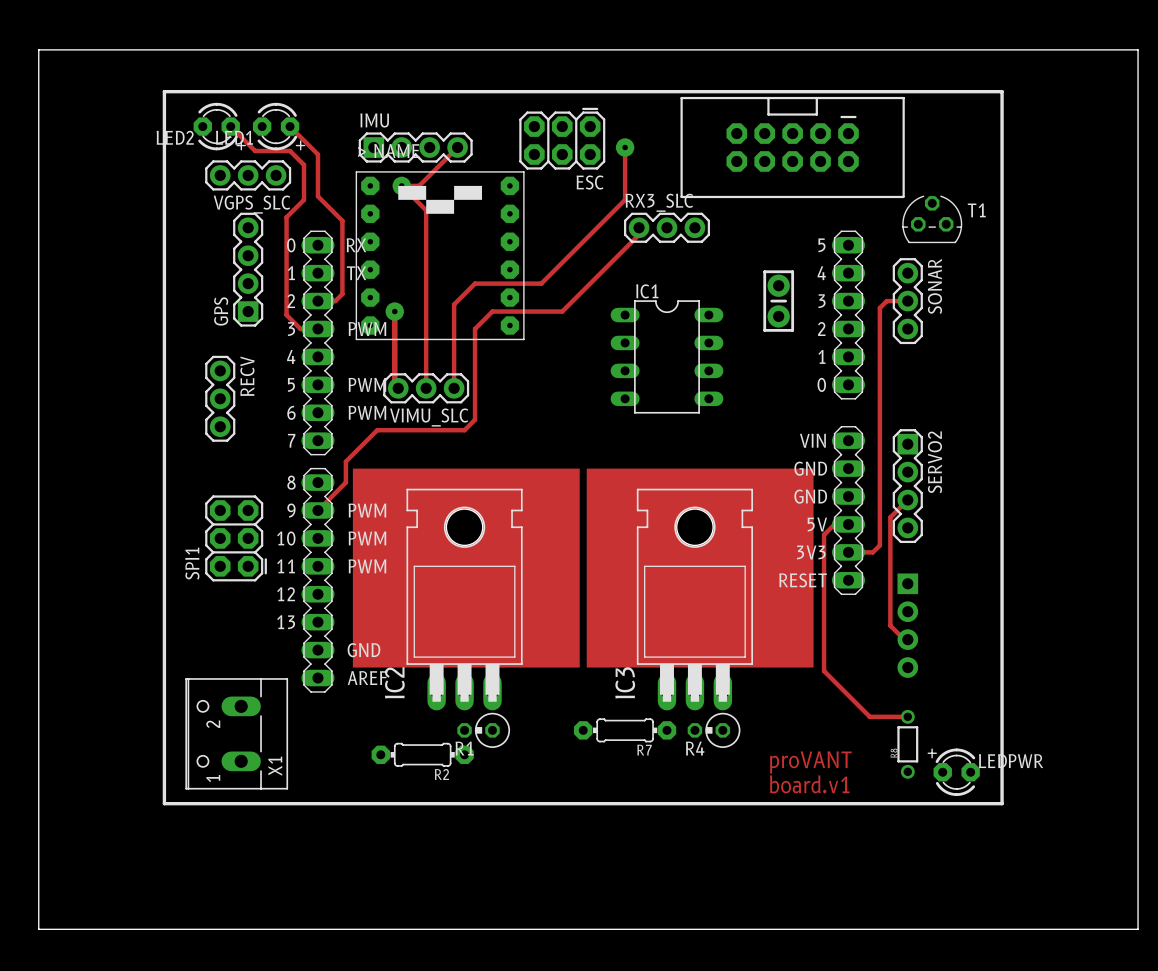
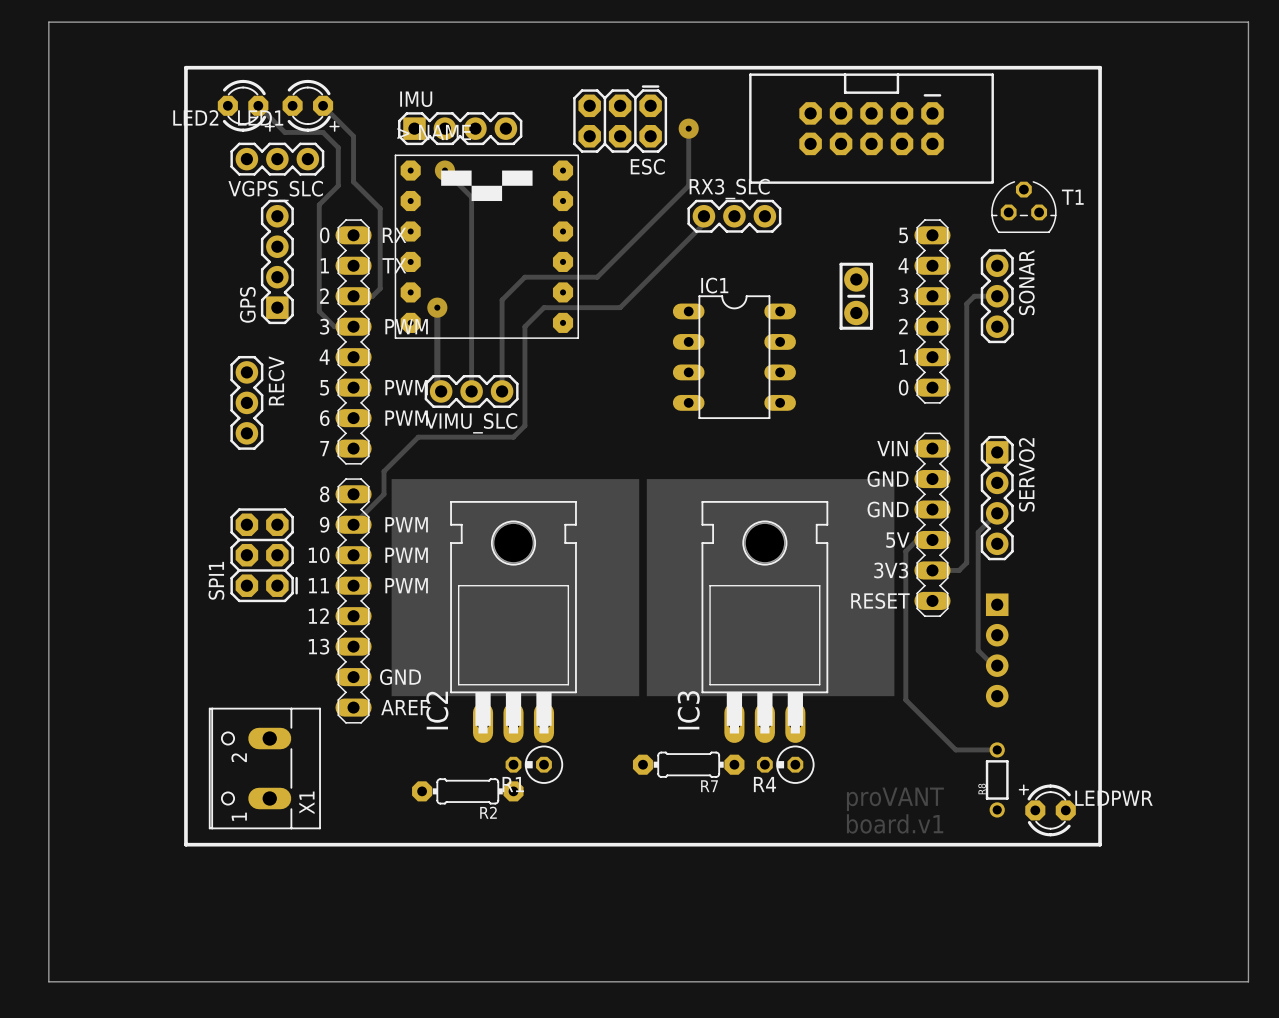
track: (457, 147) (419, 185) (401, 185) -> none

